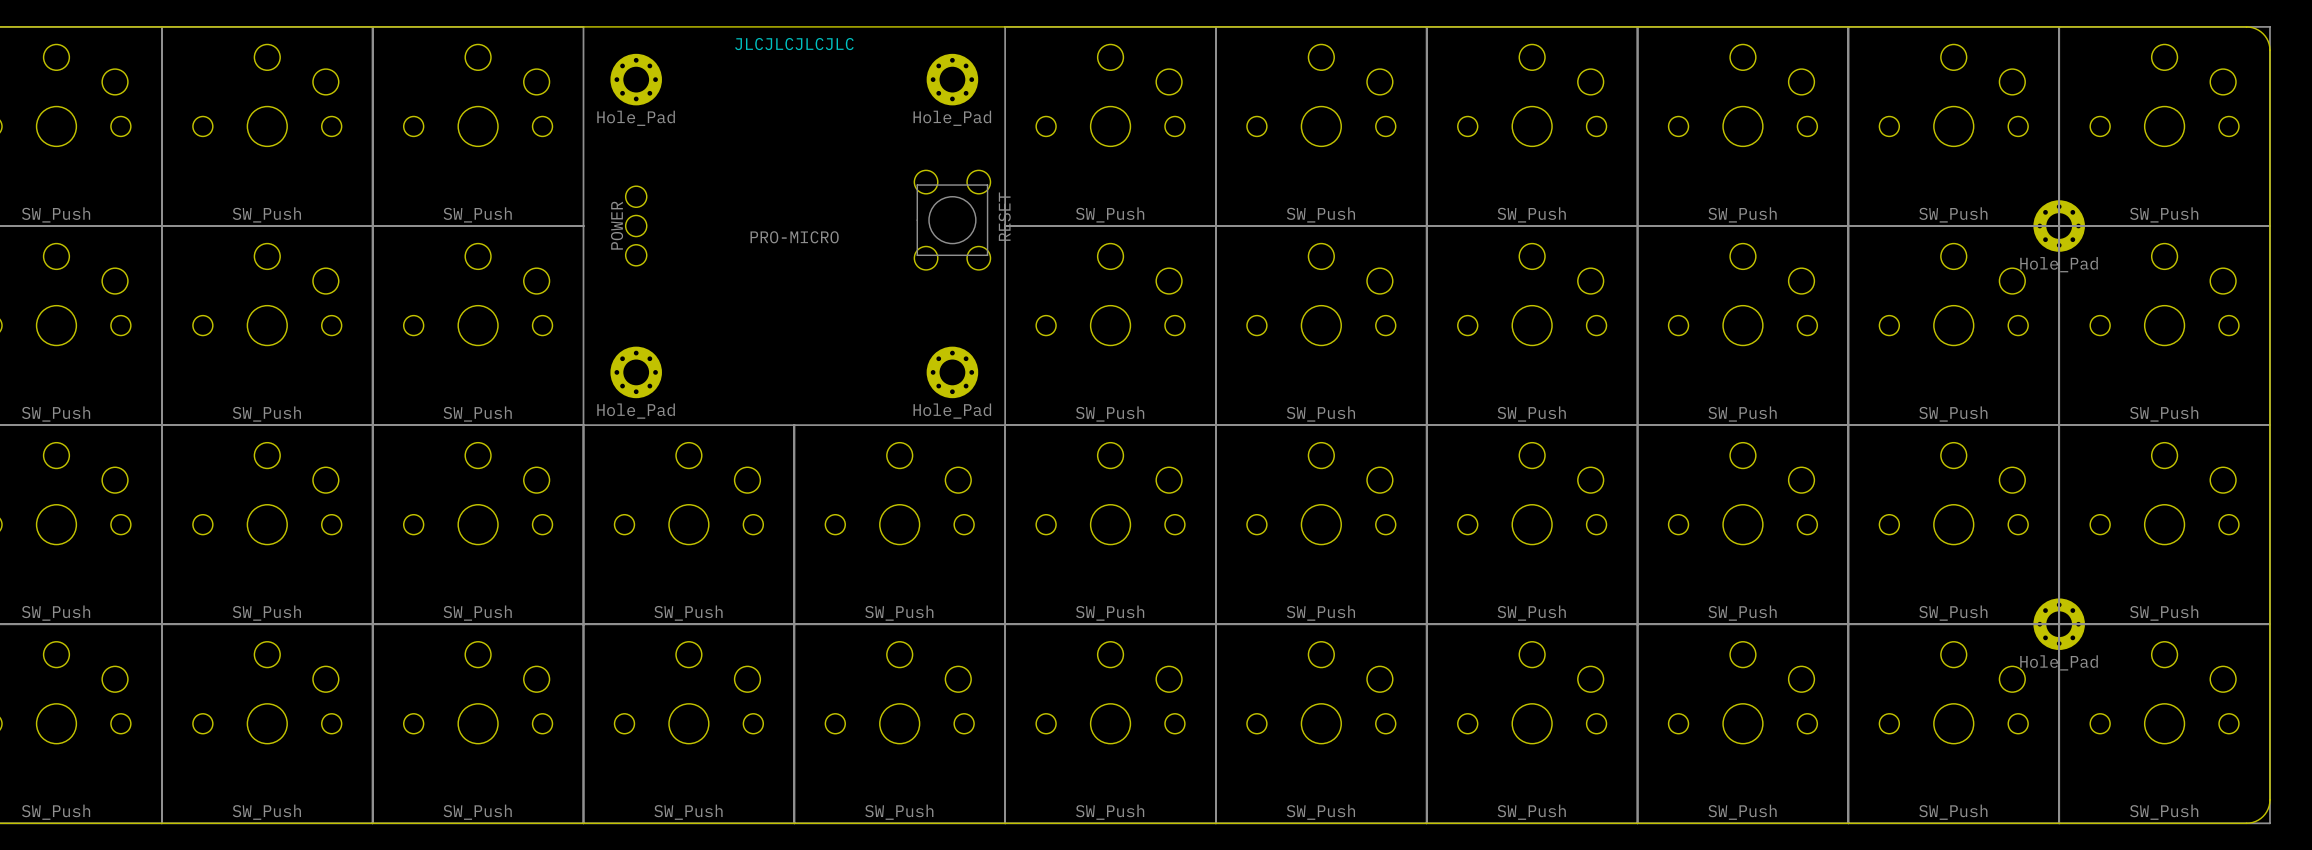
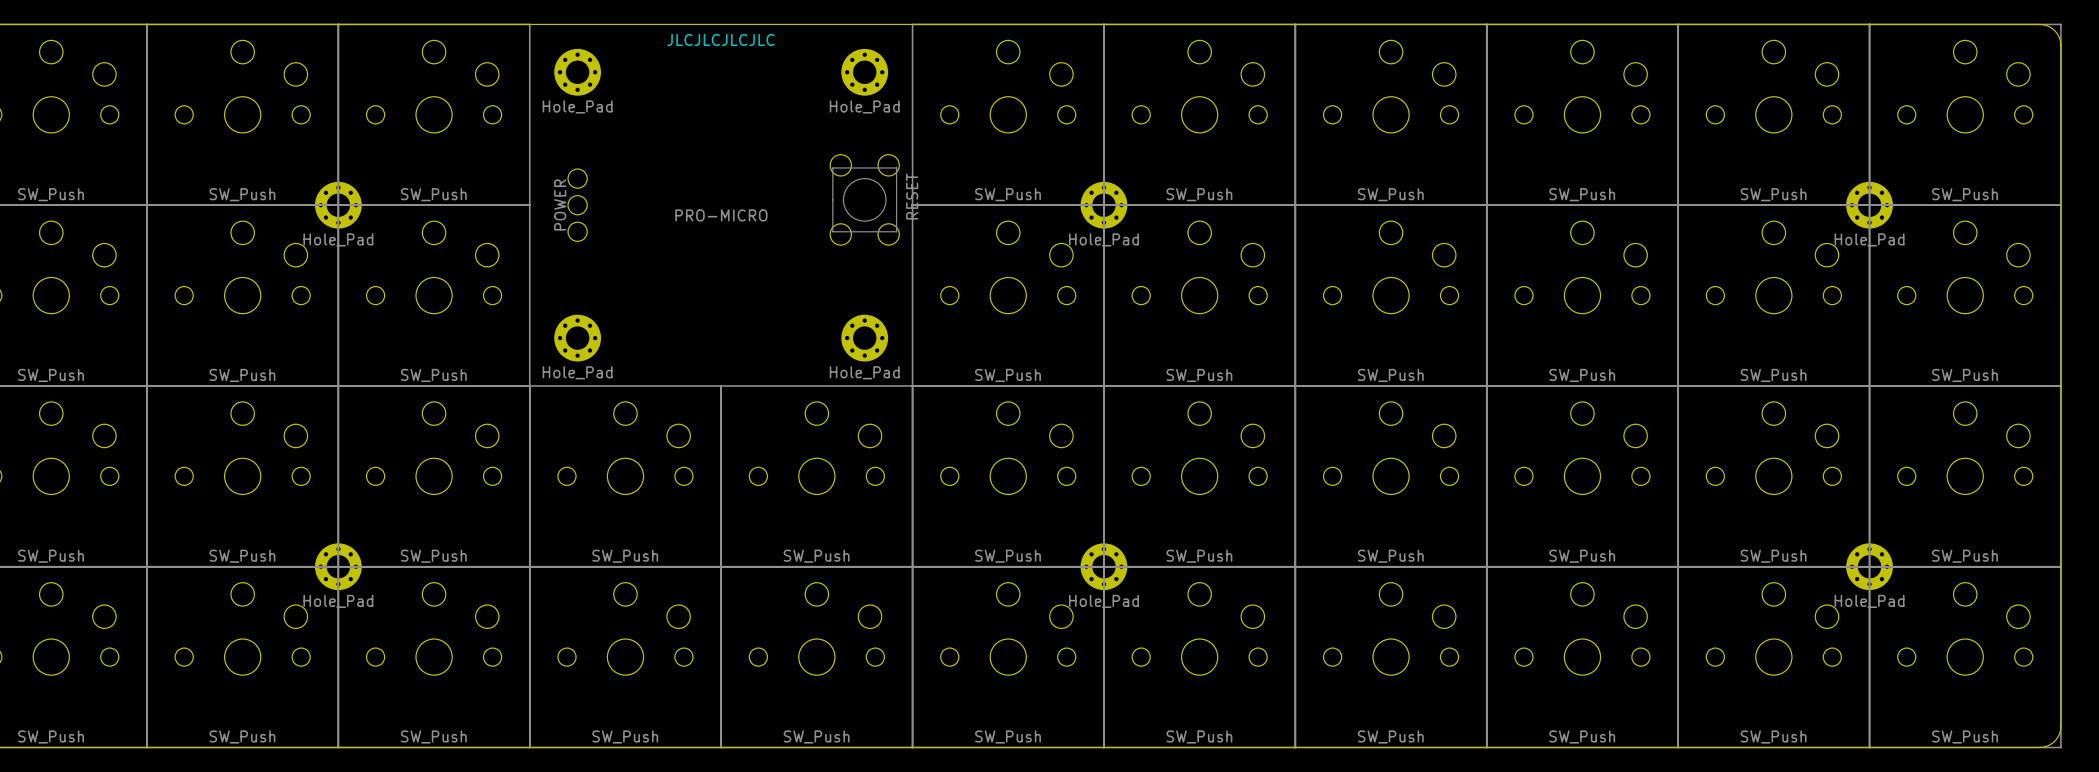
part: none -> Hole_Pad (338, 205)
part: none -> Hole_Pad (1103, 205)
part: none -> Hole_Pad (338, 566)
part: none -> Hole_Pad (1103, 566)

